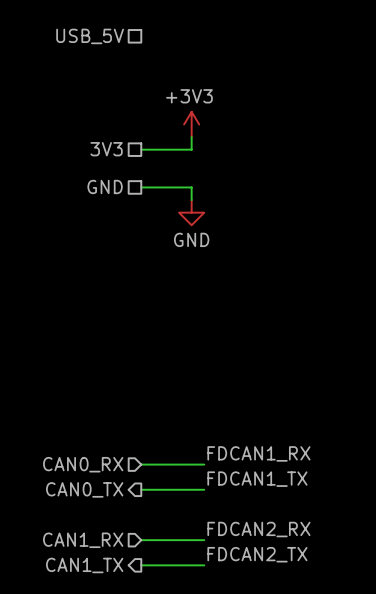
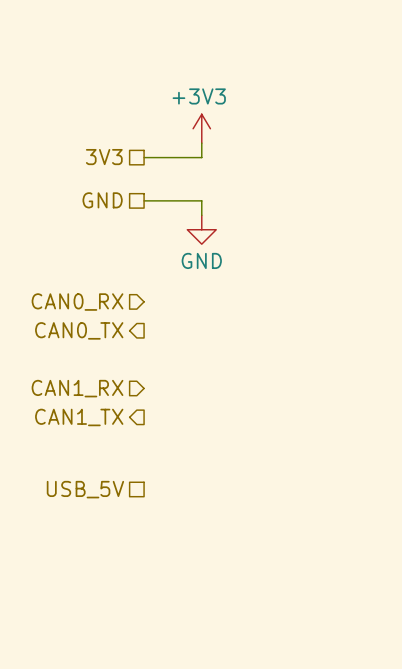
hierarchical label: USB_5V (90, 36) -> none
hierarchical label: none -> USB_5V (85, 489)
label: FDCAN1_RX (258, 453) -> none
hierarchical label position: CAN0_RX (83, 464) -> CAN0_RX (77, 302)
wire: (141, 464) (204, 464) -> none
label: FDCAN1_TX (257, 479) -> none
hierarchical label position: CAN0_TX (84, 489) -> CAN0_TX (79, 330)
wire: (141, 489) (204, 489) -> none
label: FDCAN2_RX (258, 529) -> none
hierarchical label position: CAN1_RX (83, 540) -> CAN1_RX (77, 388)
wire: (141, 540) (204, 540) -> none
label: FDCAN2_TX (257, 554) -> none
hierarchical label position: CAN1_TX (84, 565) -> CAN1_TX (79, 417)
wire: (141, 565) (204, 565) -> none

